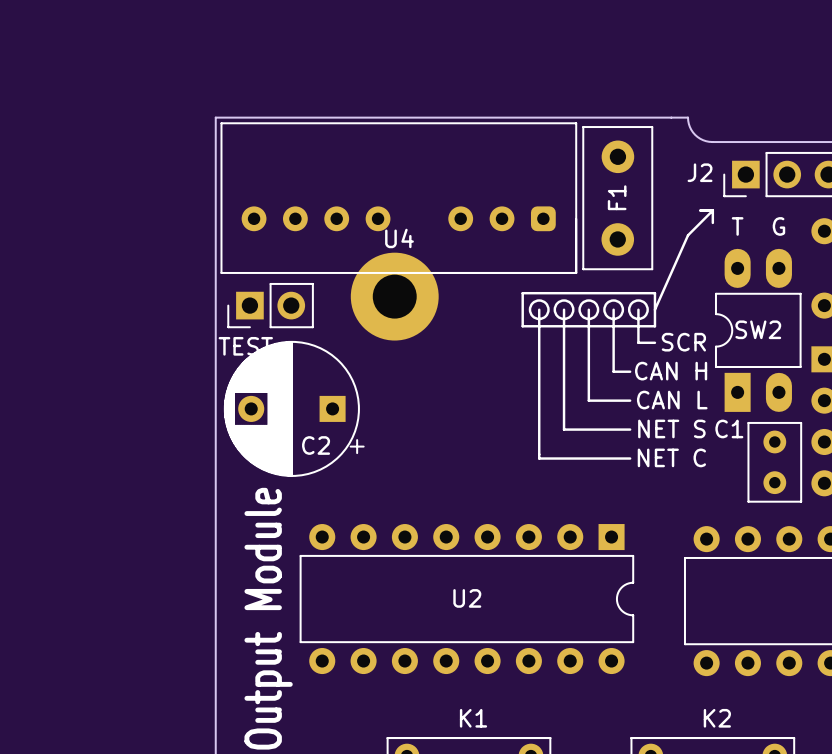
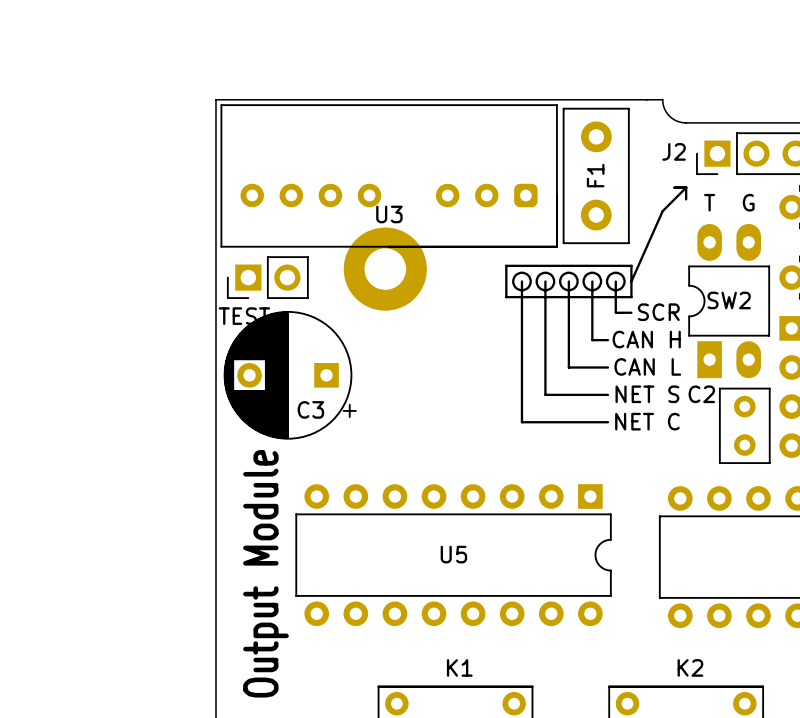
U4 name: U4 (399, 238) -> U3 (389, 214)
C1 name: C1 (729, 428) -> C2 (701, 394)
C2 name: C2 (316, 445) -> C3 (310, 409)
U2 name: U2 (467, 598) -> U5 (453, 554)

